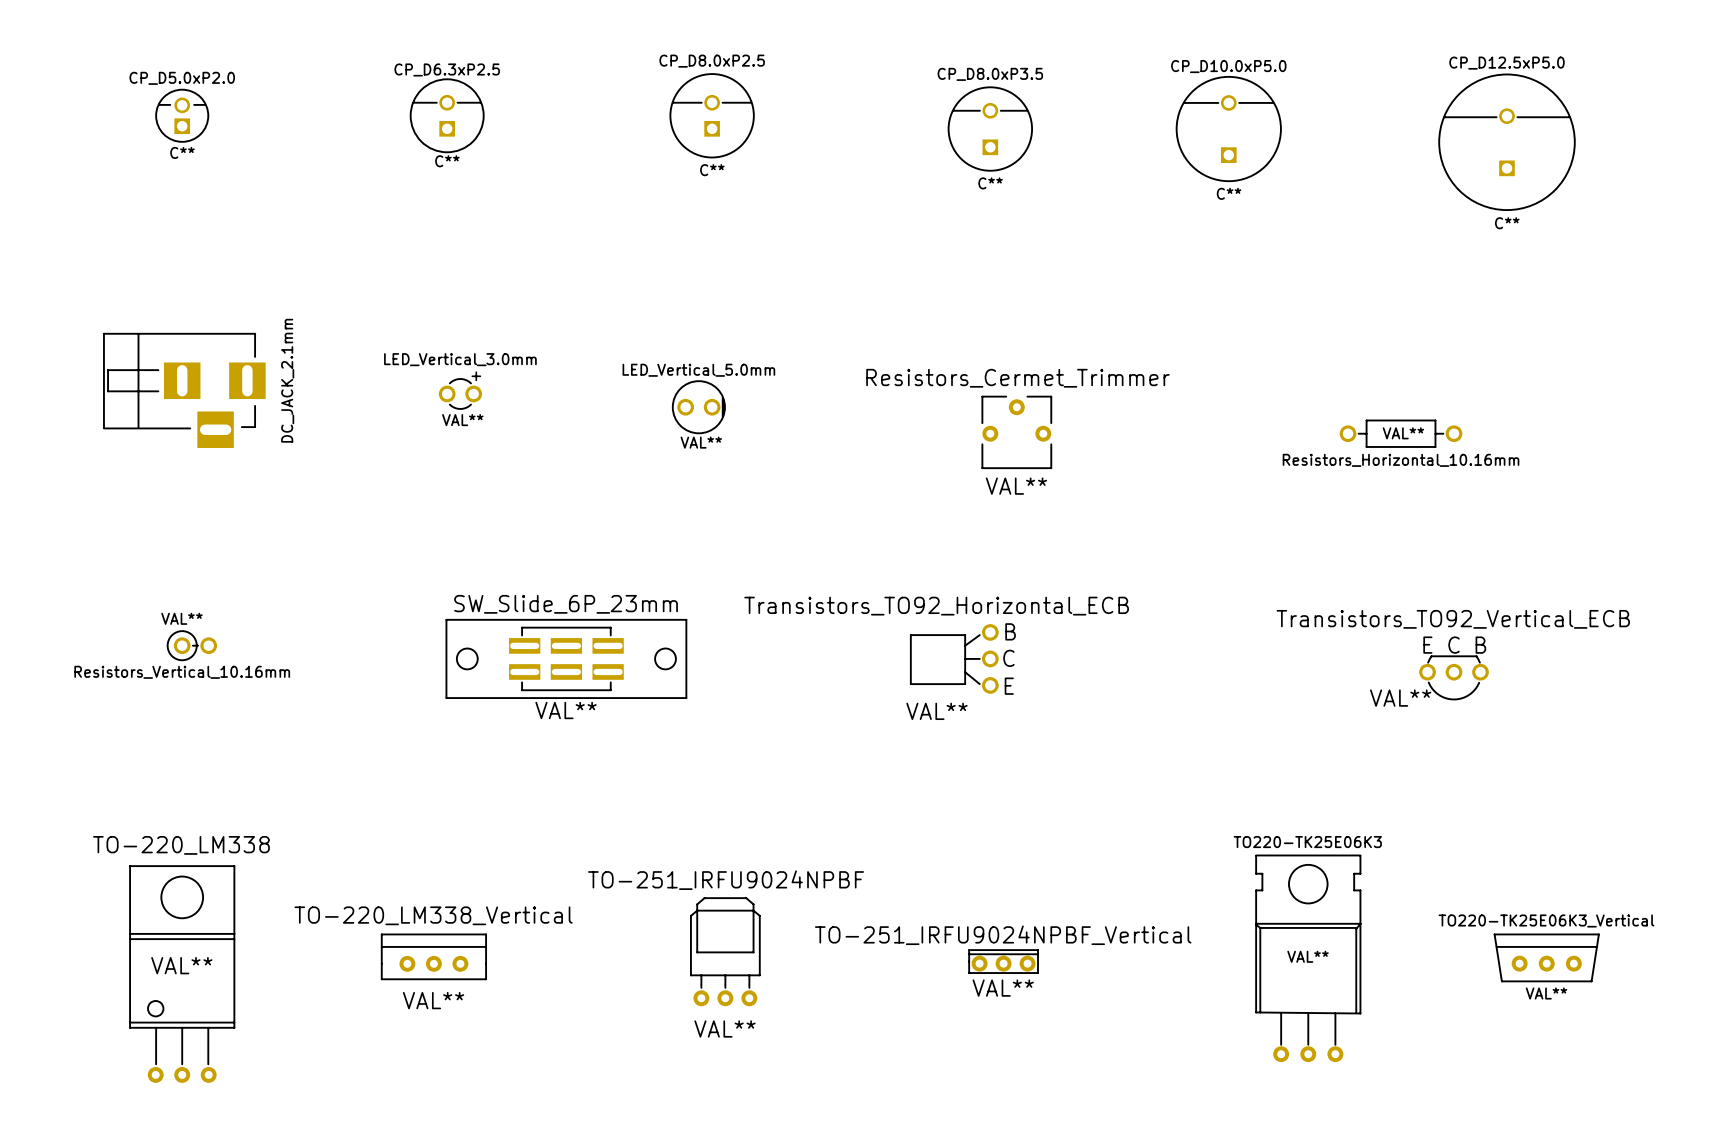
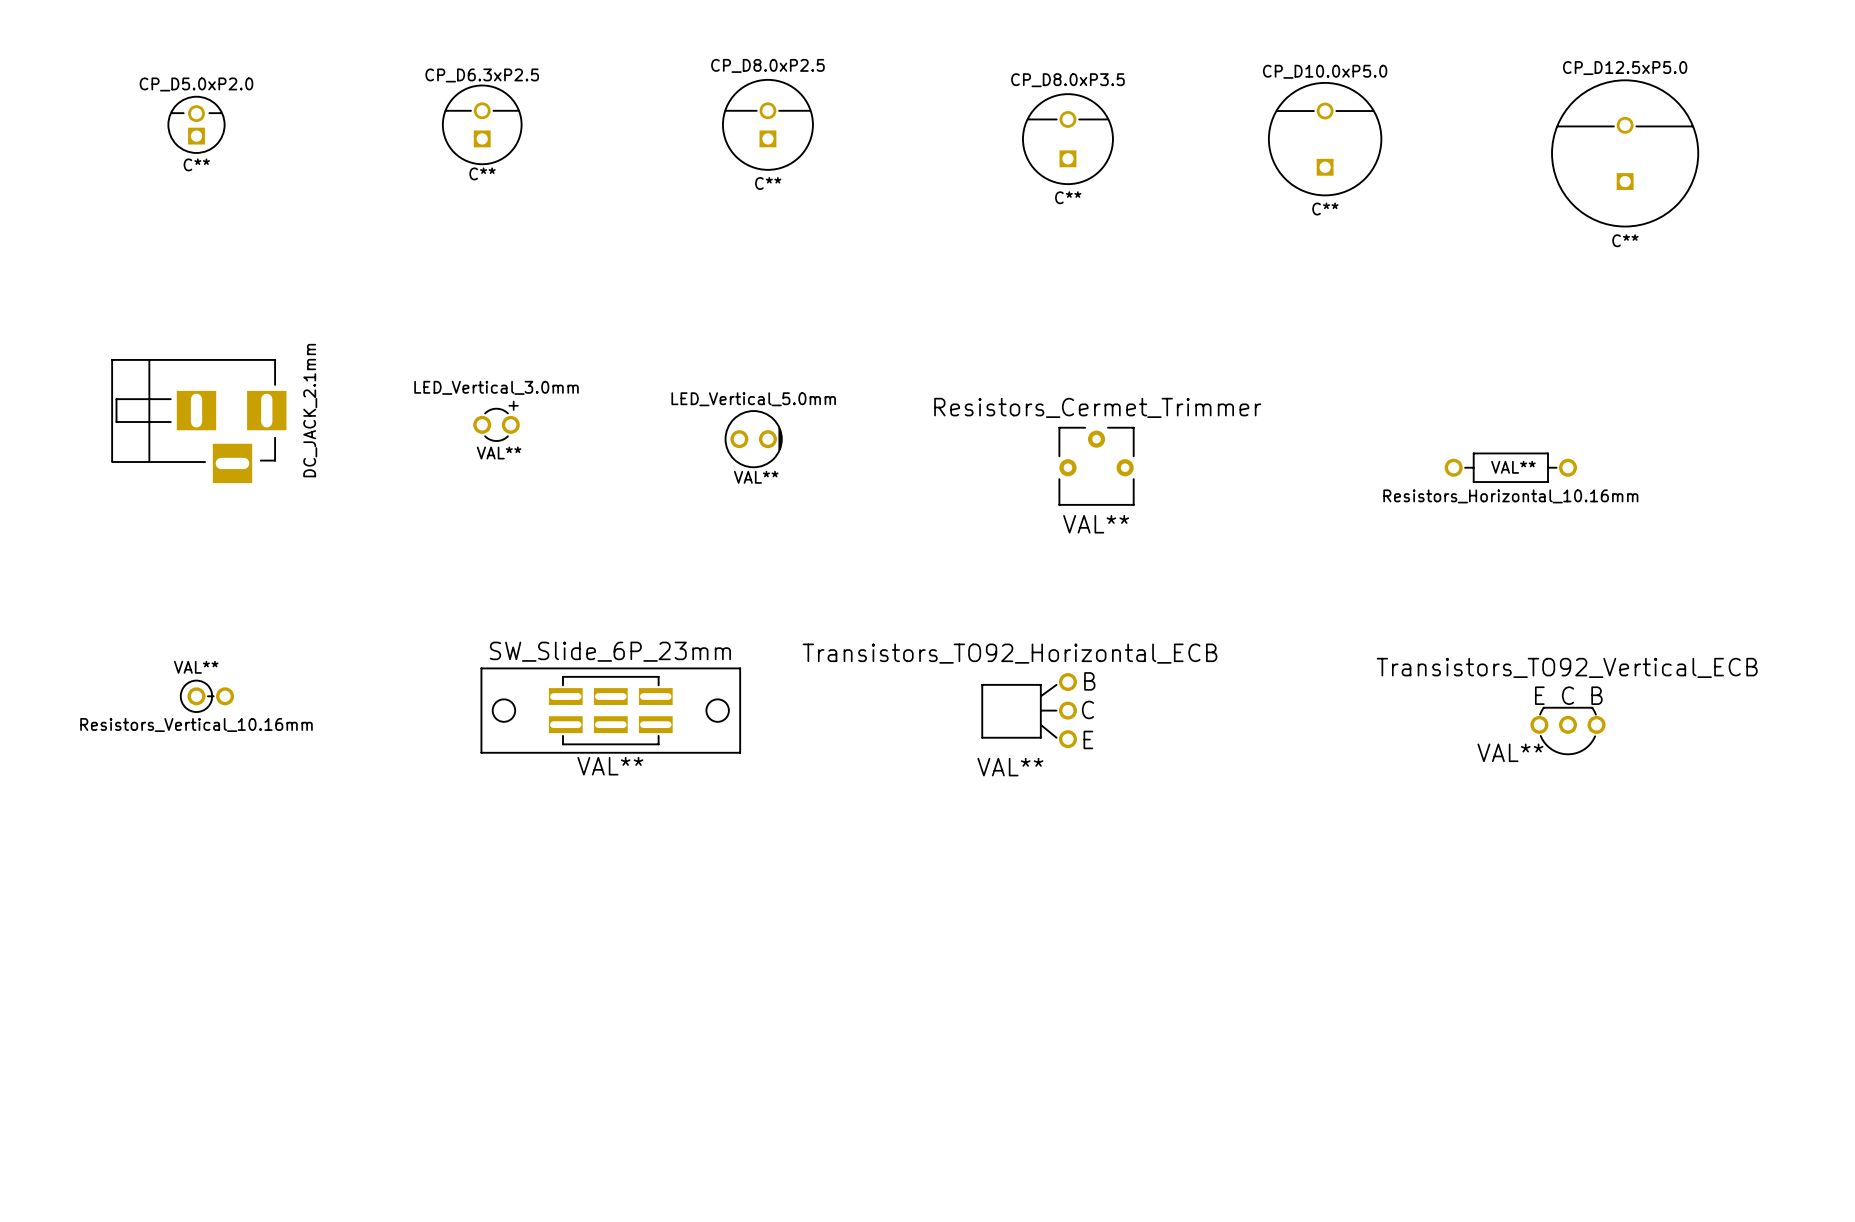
TO-251_IRFU9024NPBF: VAL** (725, 951) -> none
TO-220_LM338_Vertical: VAL** (433, 956) -> none
TO220-TK25E06K3_Vertical: VAL** (1546, 957) -> none
TO220-TK25E06K3: VAL** (1308, 958) -> none
TO-251_IRFU9024NPBF_Vertical: VAL** (1003, 961) -> none
TO-220_LM338: VAL** (182, 974) -> none

